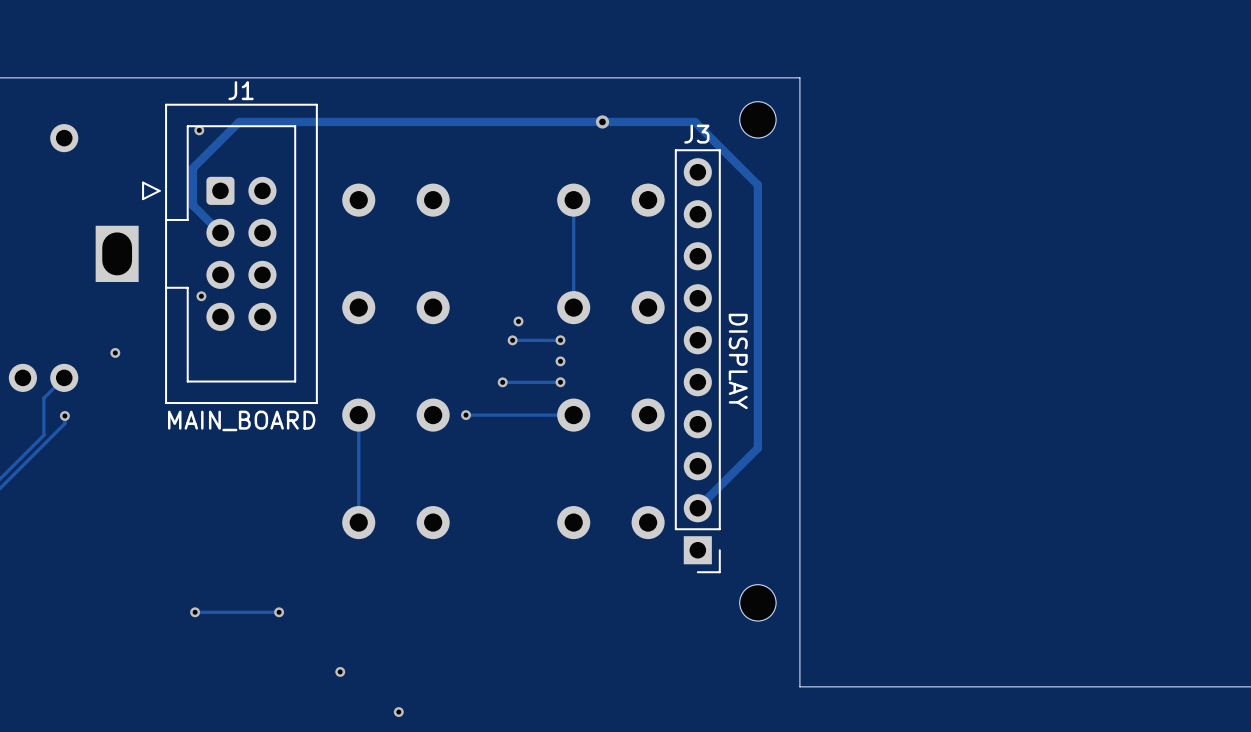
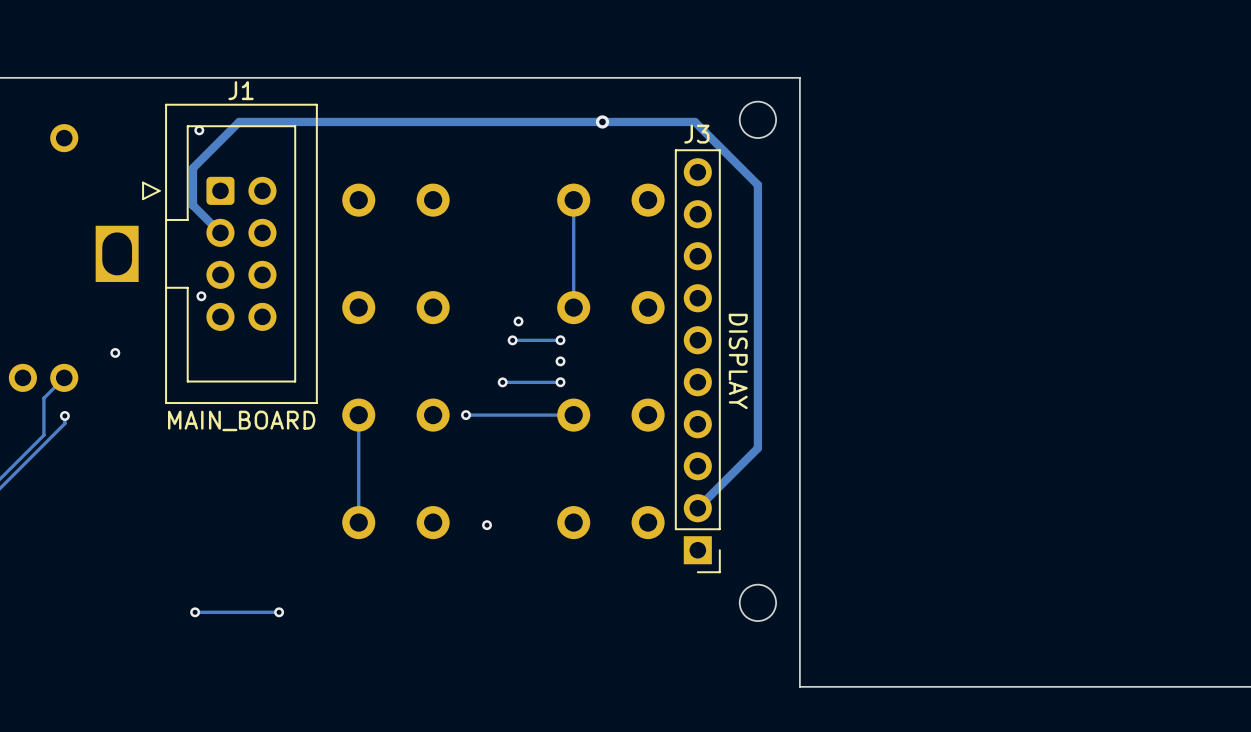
via: none -> (487, 525)
via: (340, 671) -> none
via: (398, 712) -> none

